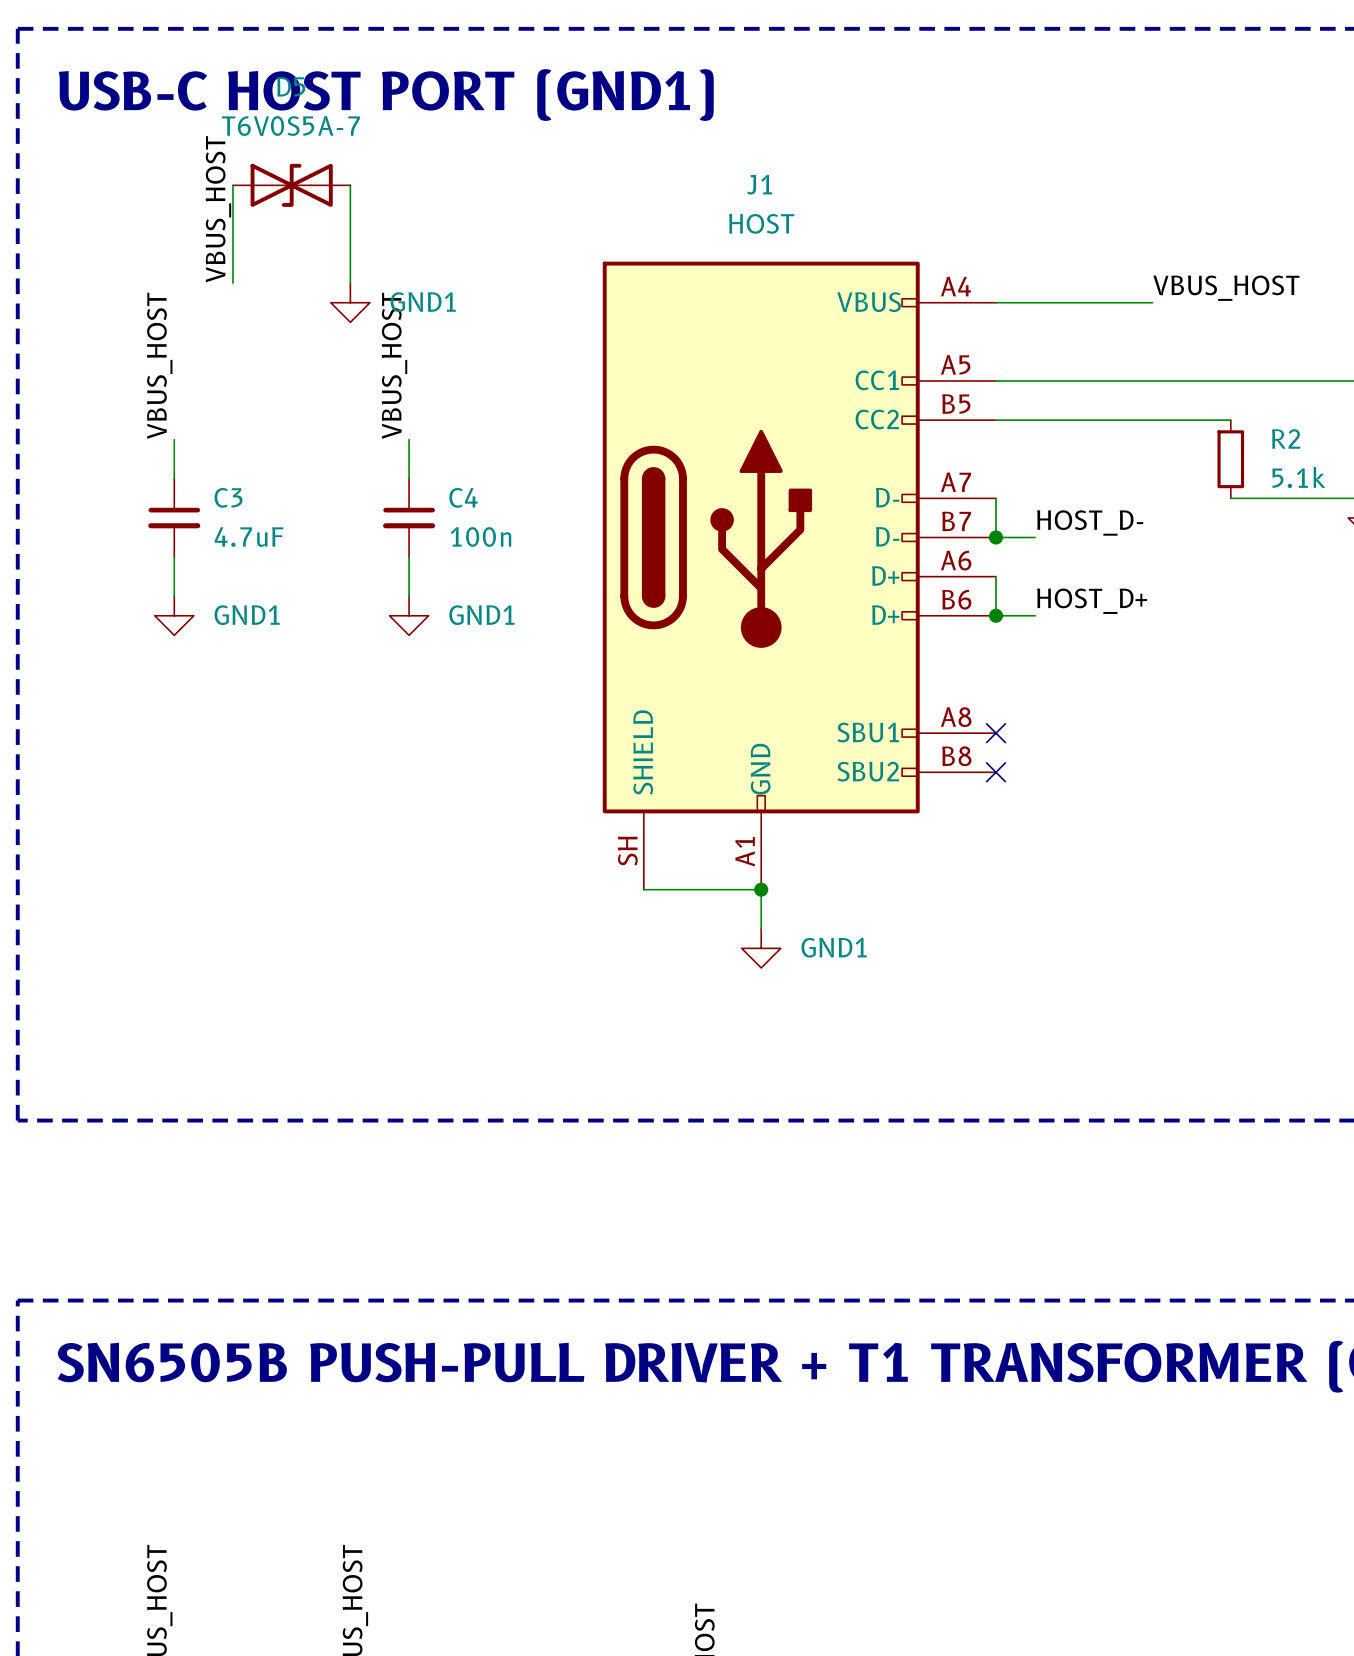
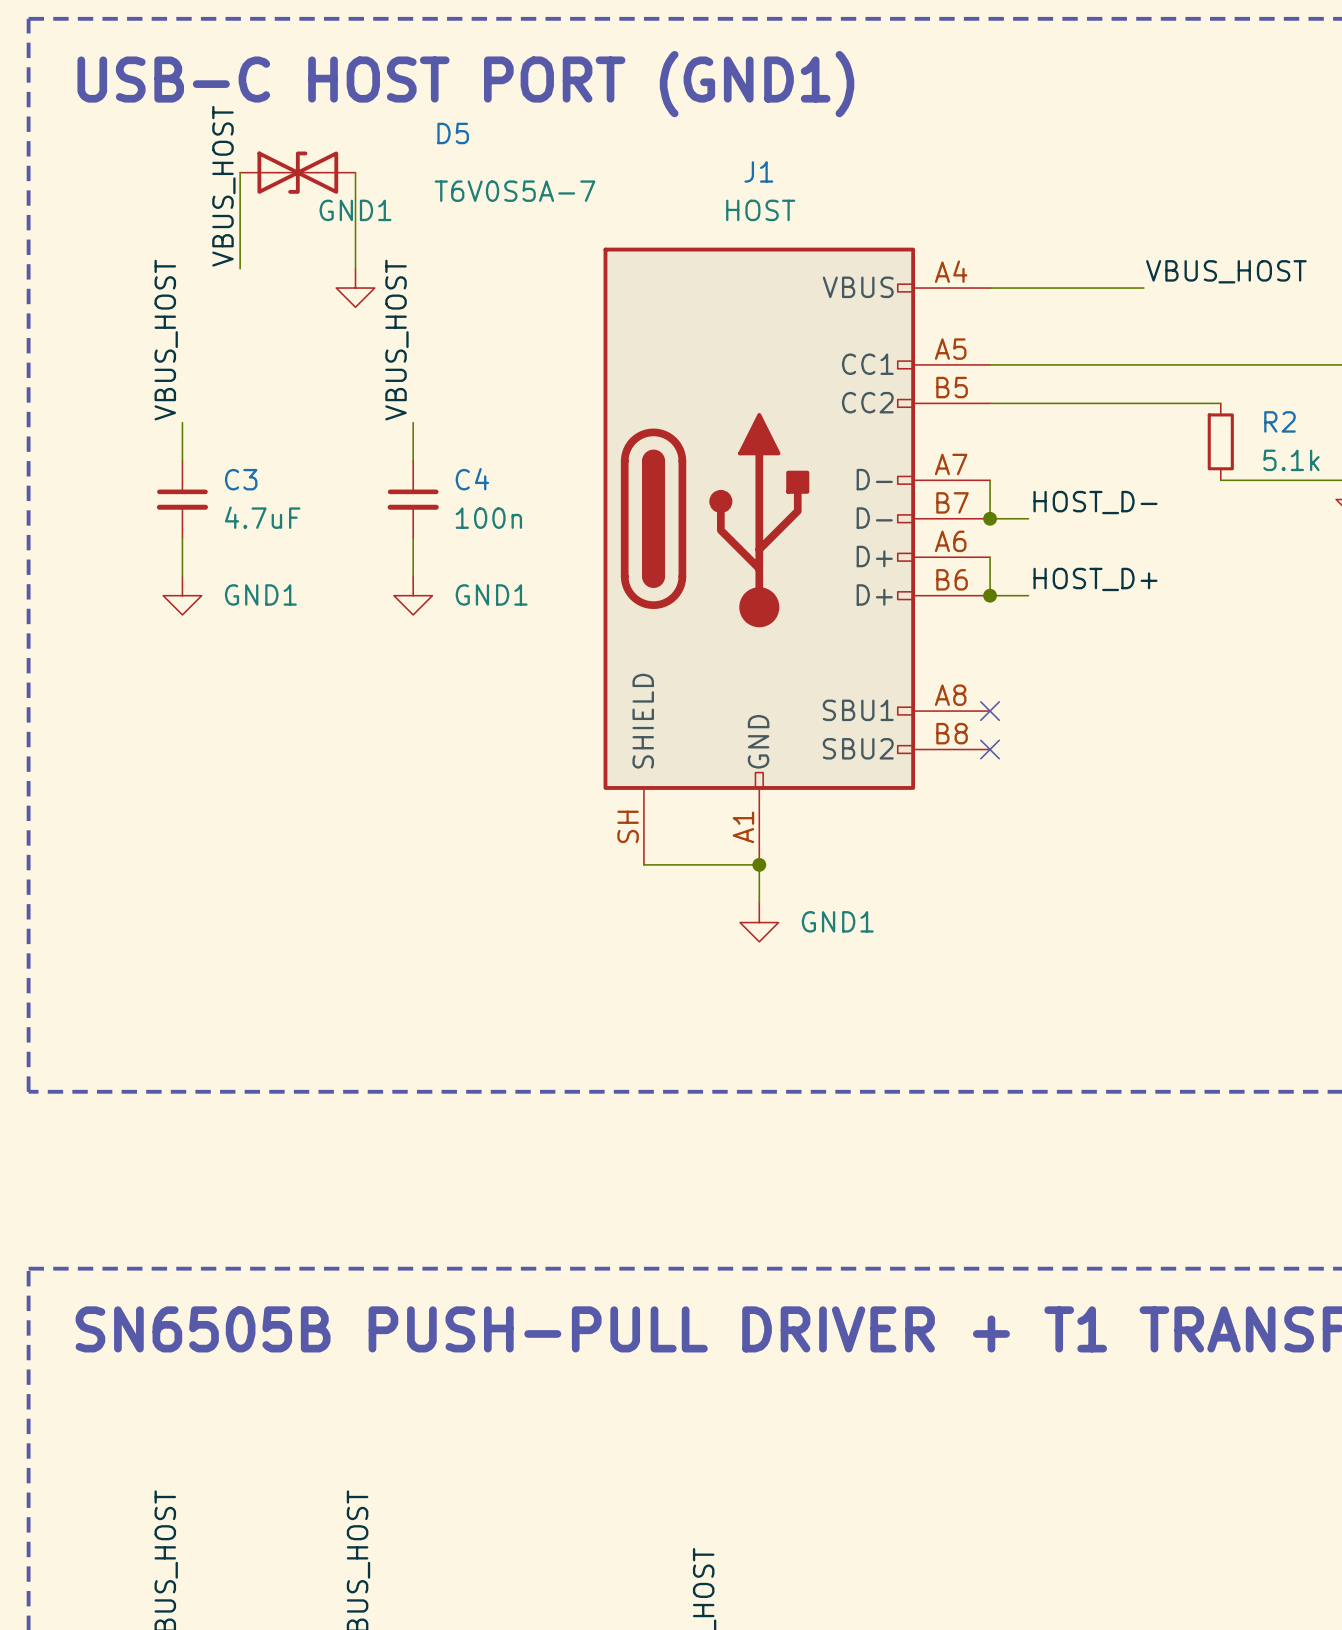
D5 name position: D5 (291, 86) -> D5 (453, 133)
D5 value position: T6V0S5A-7 (290, 126) -> T6V0S5A-7 (514, 191)
power symbol text position: GND1 (423, 302) -> GND1 (355, 210)

